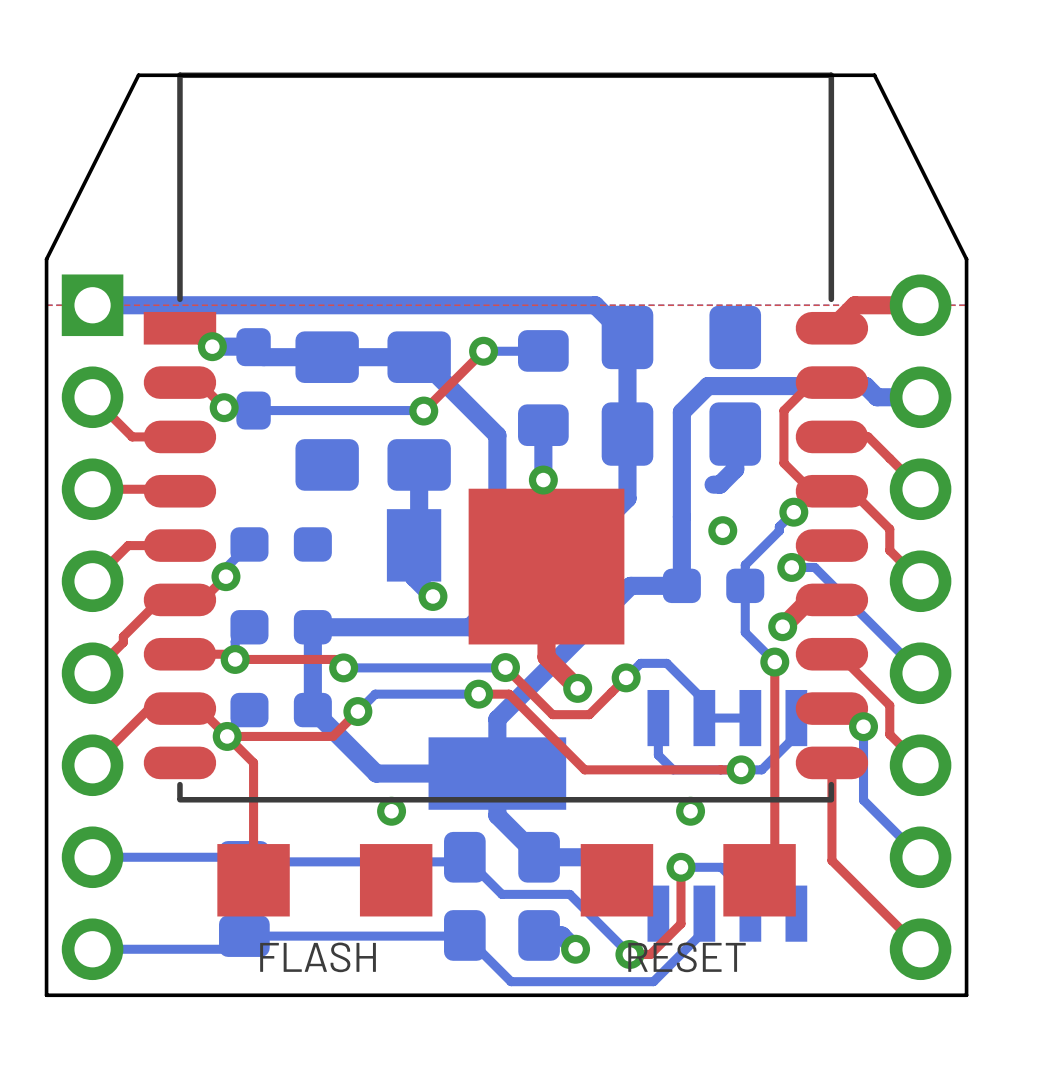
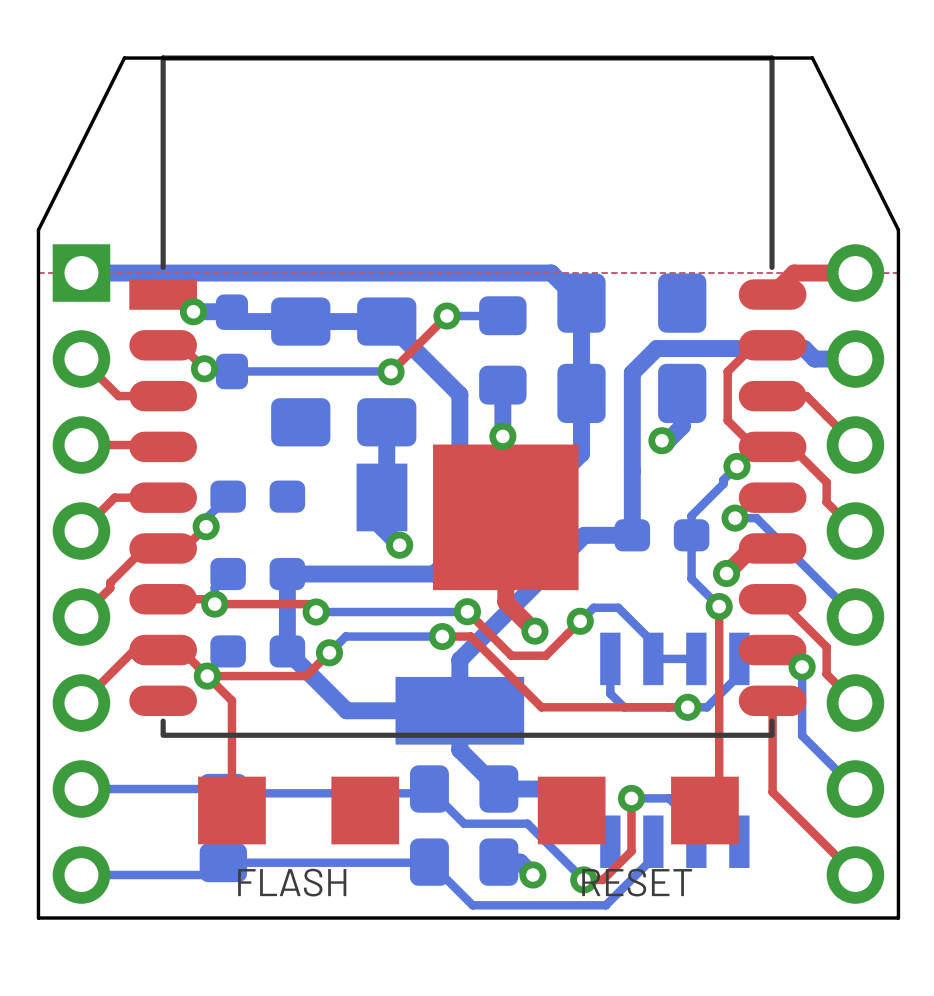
via position: (722, 530) -> (661, 440)
via: (391, 811) -> none
via: (690, 811) -> none

